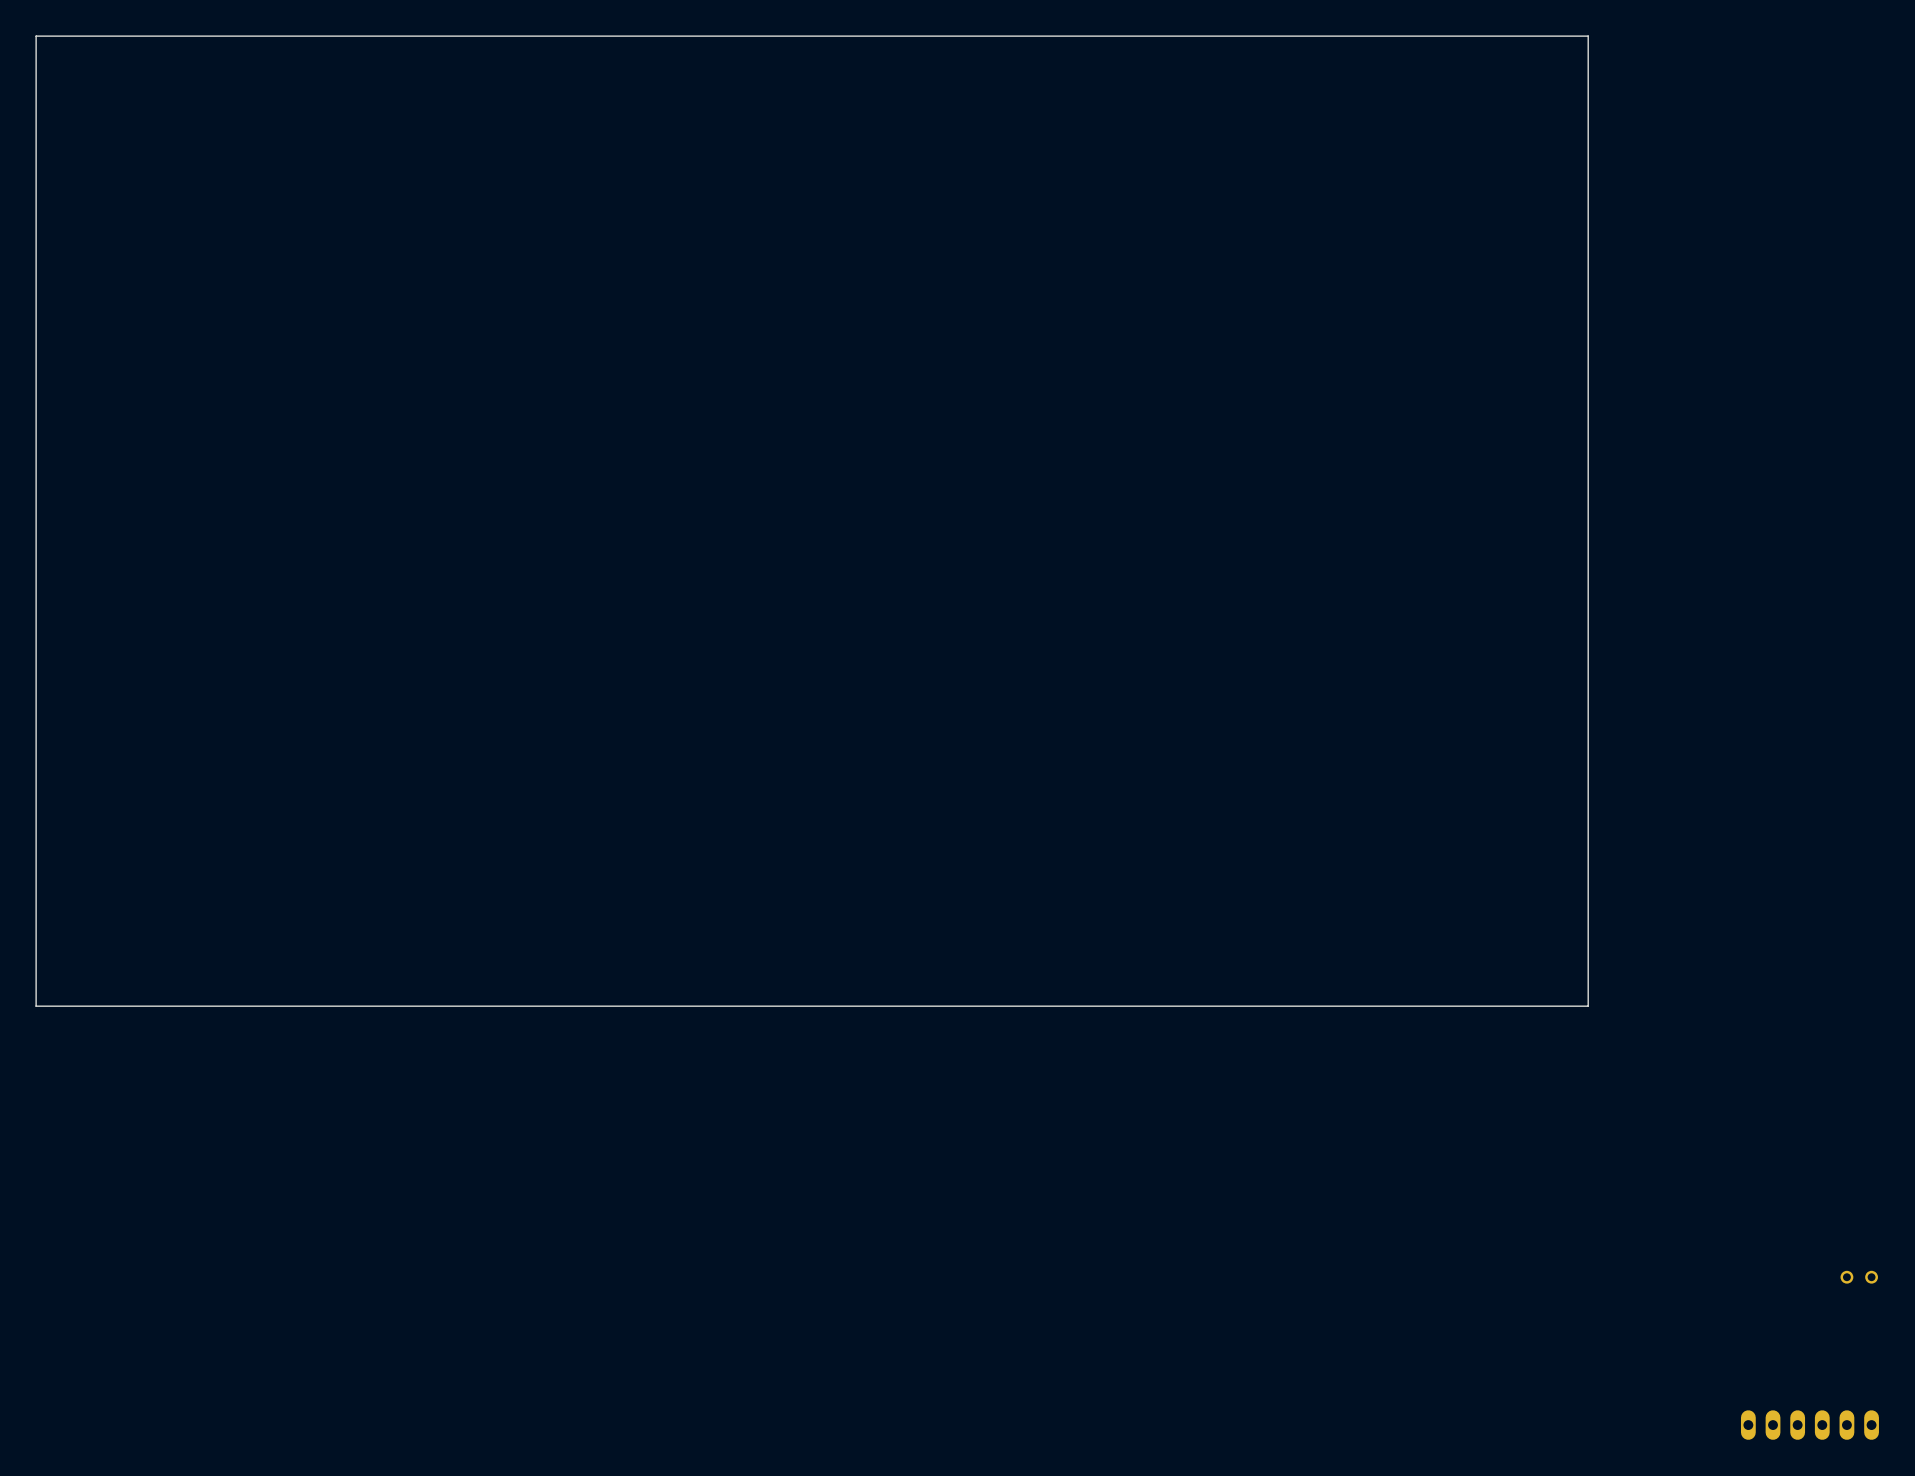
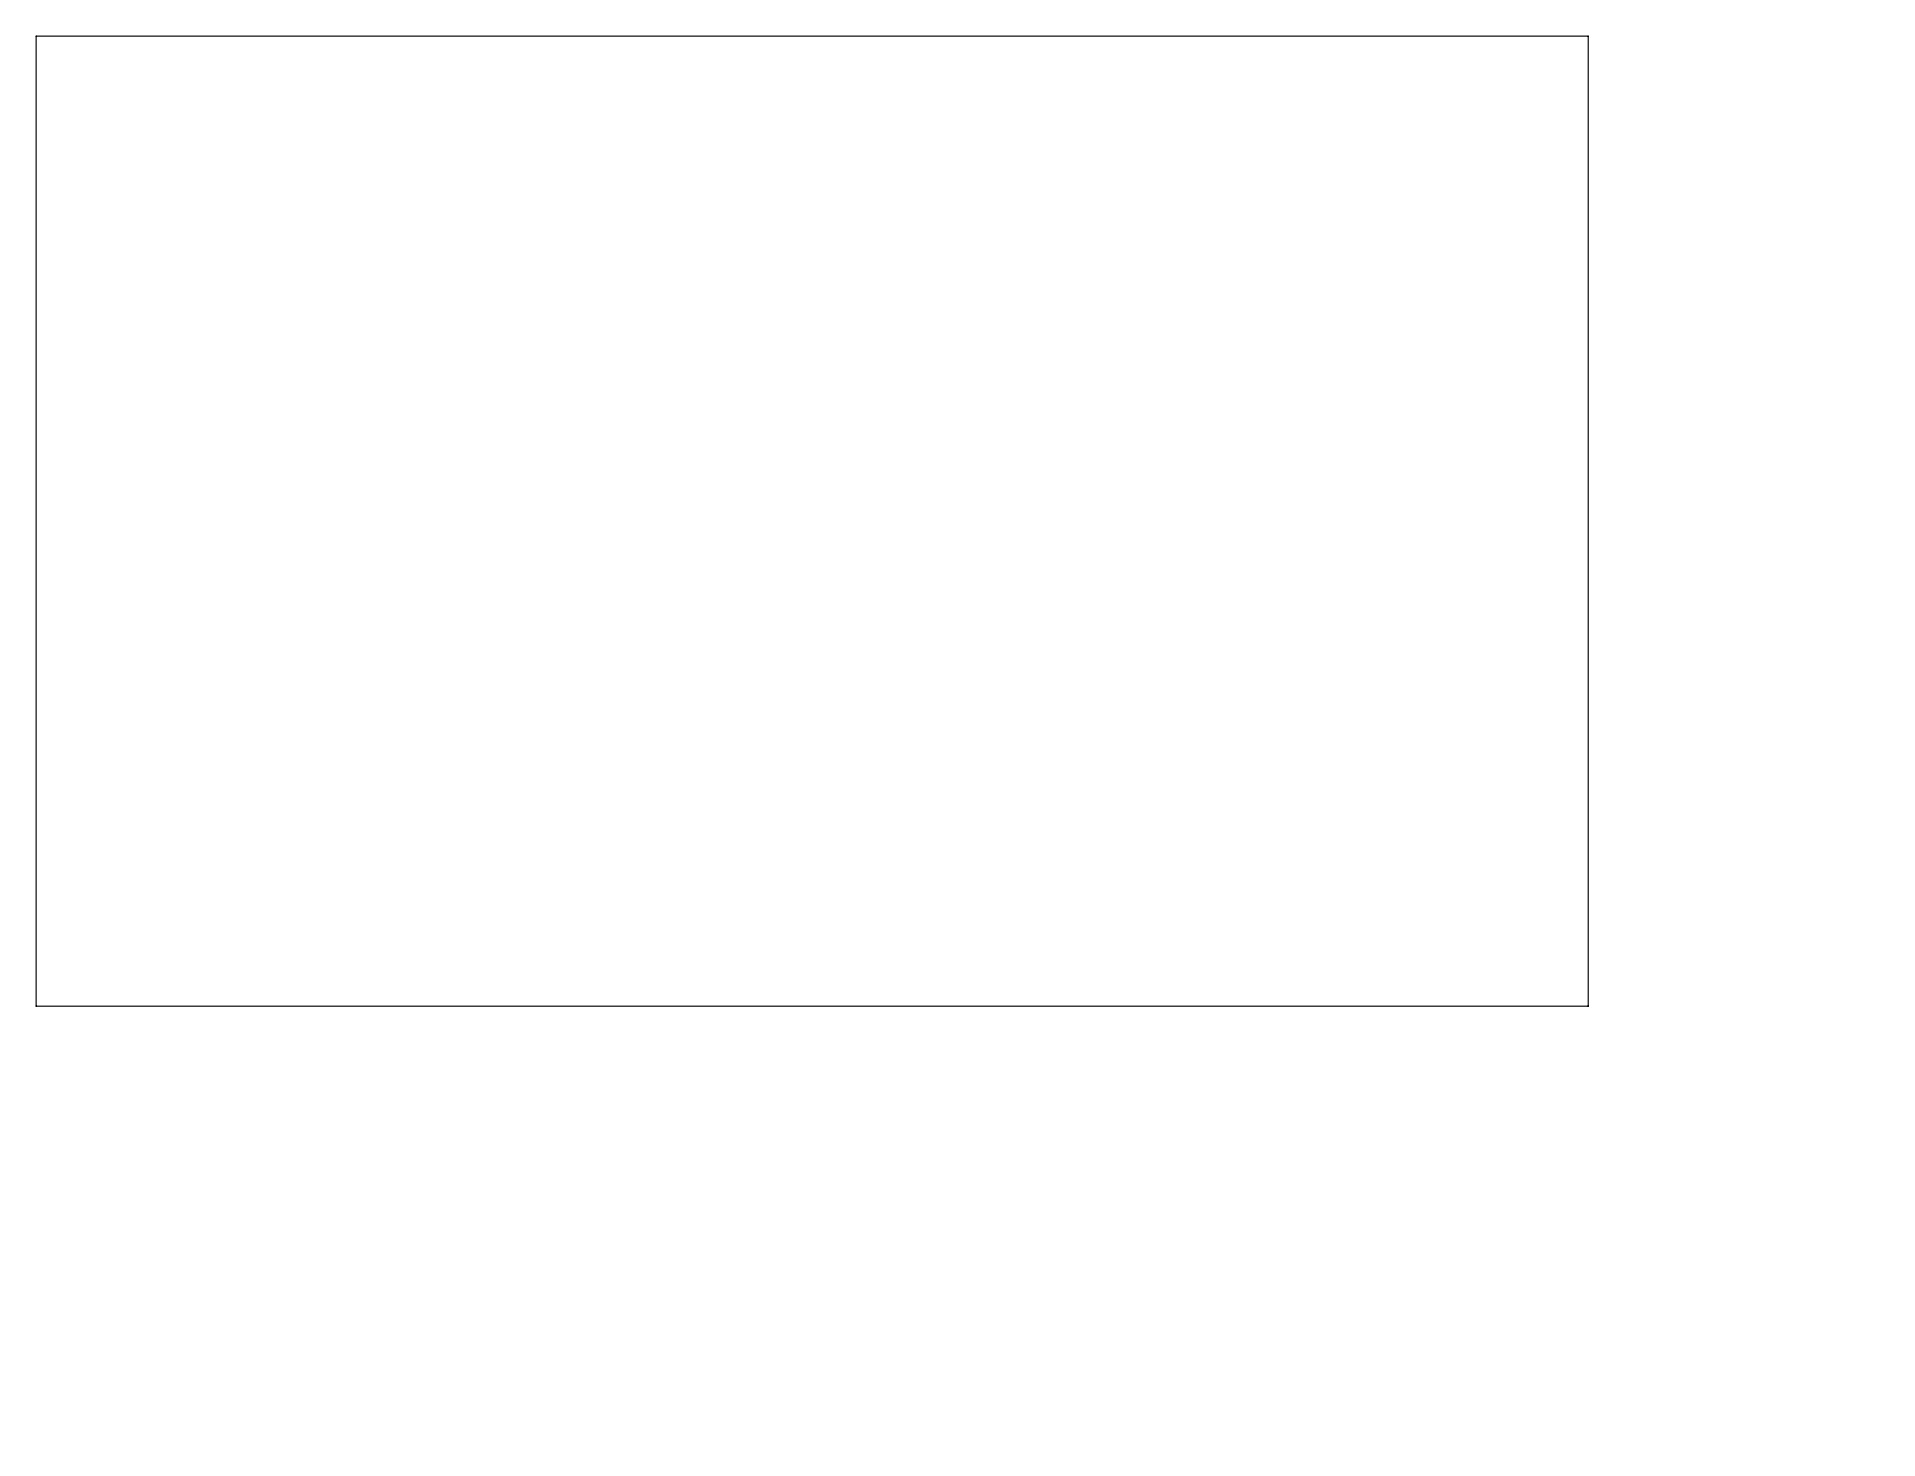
part: (1859, 1277) -> none
part: (1809, 1425) -> none

